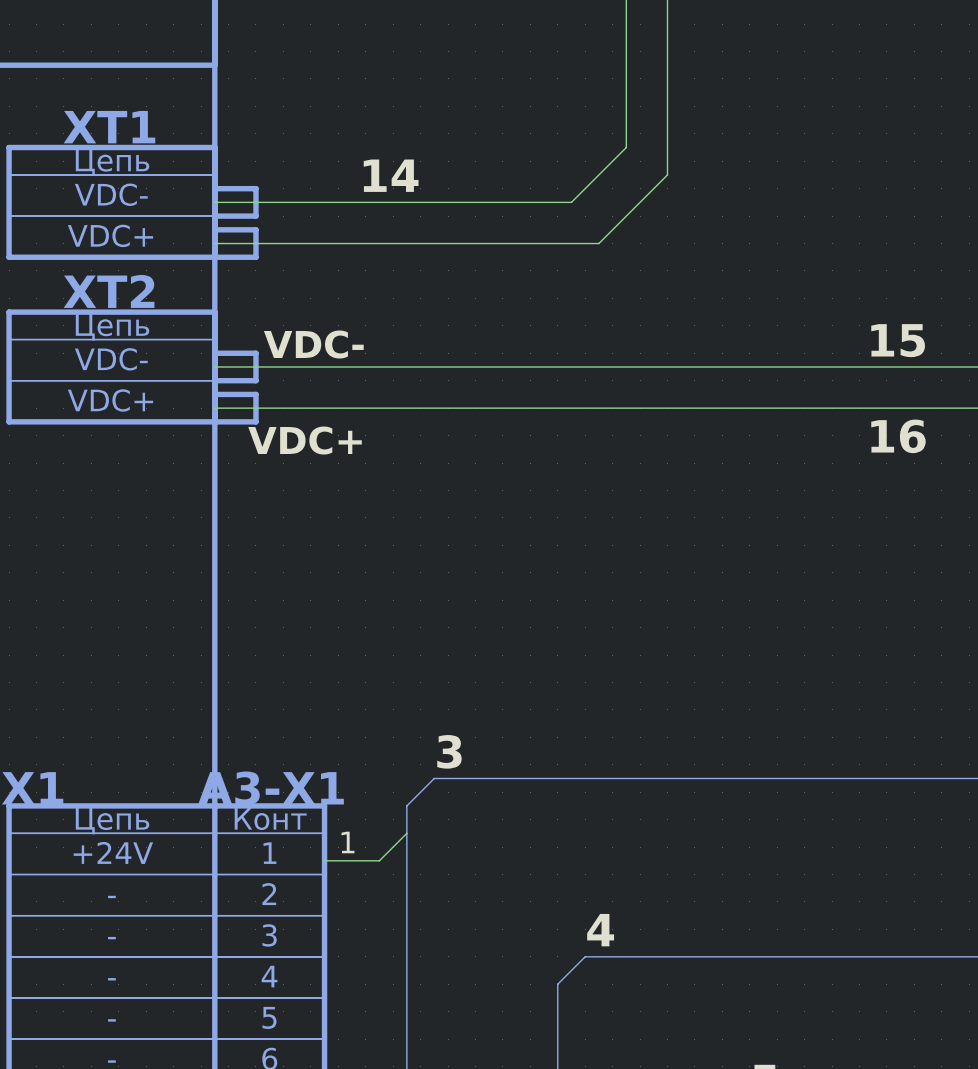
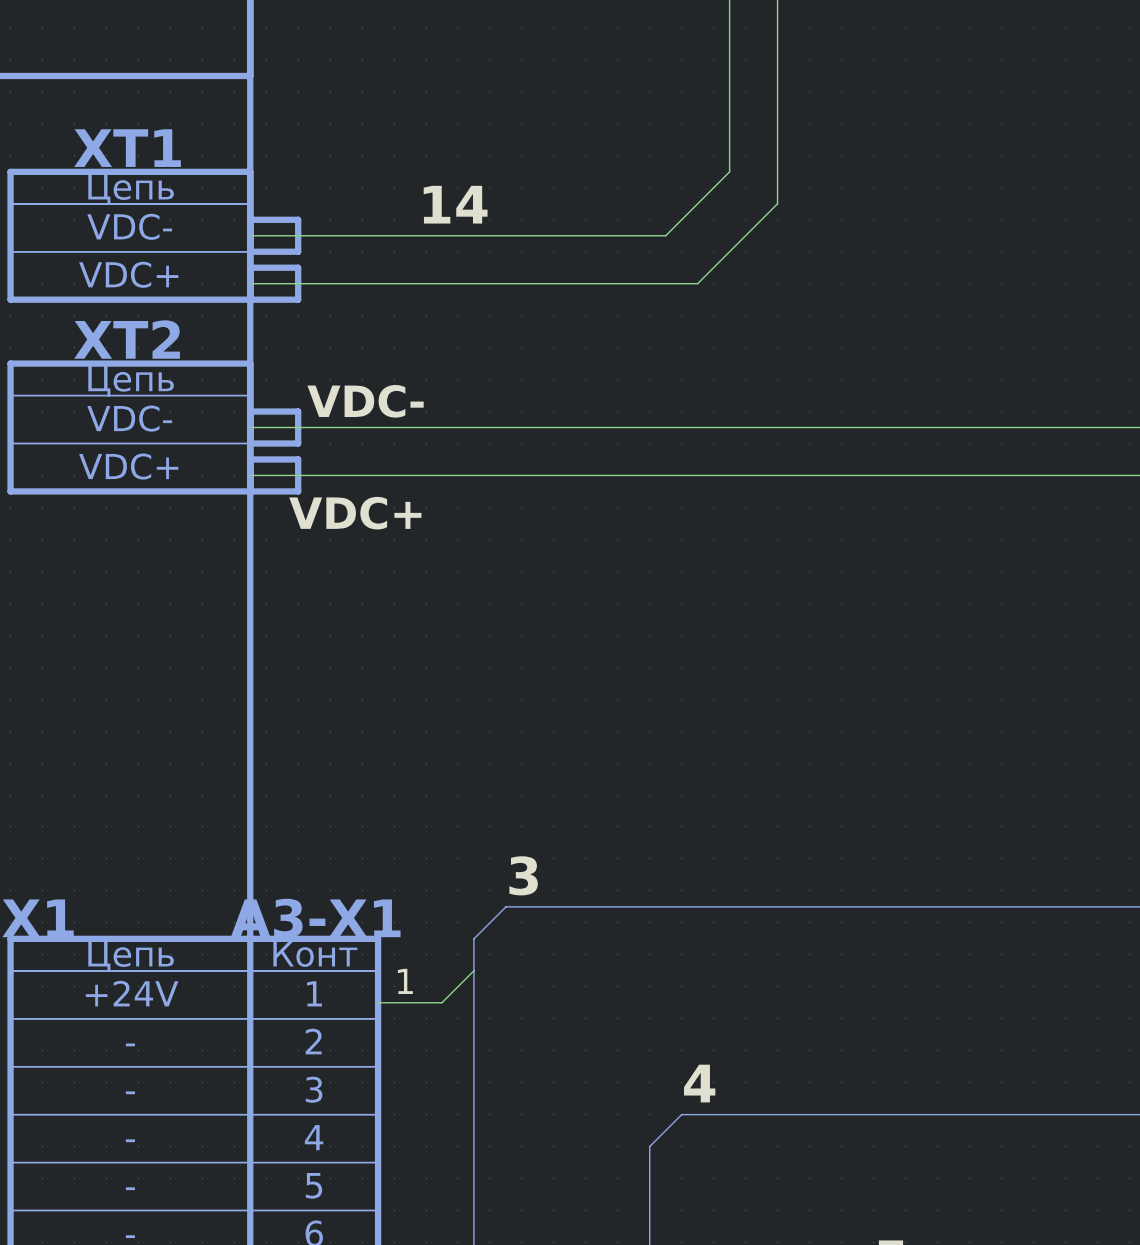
label: 15 (898, 340) -> none
label: 16 (898, 436) -> none

